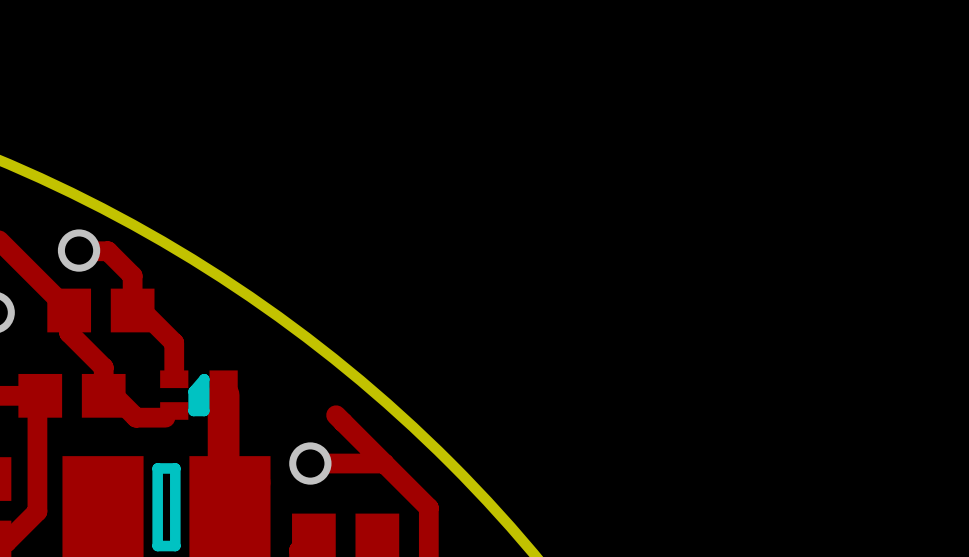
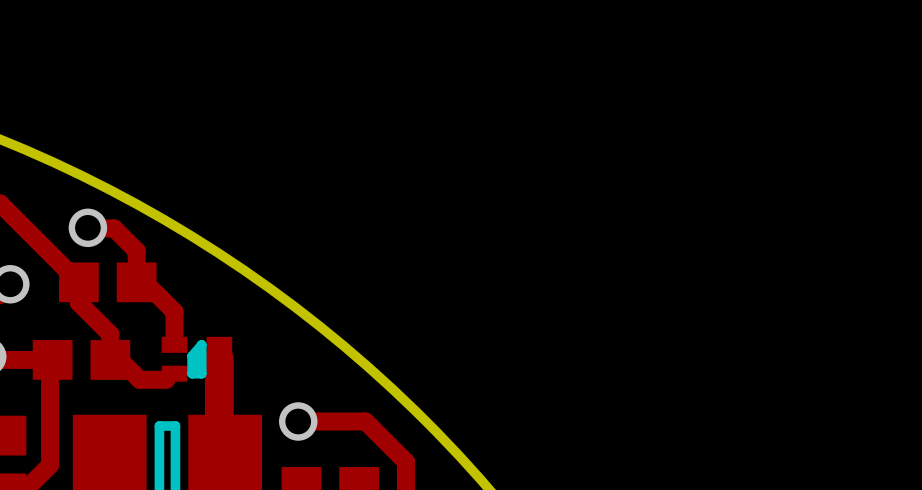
track: (336, 415) (384, 463) -> none

